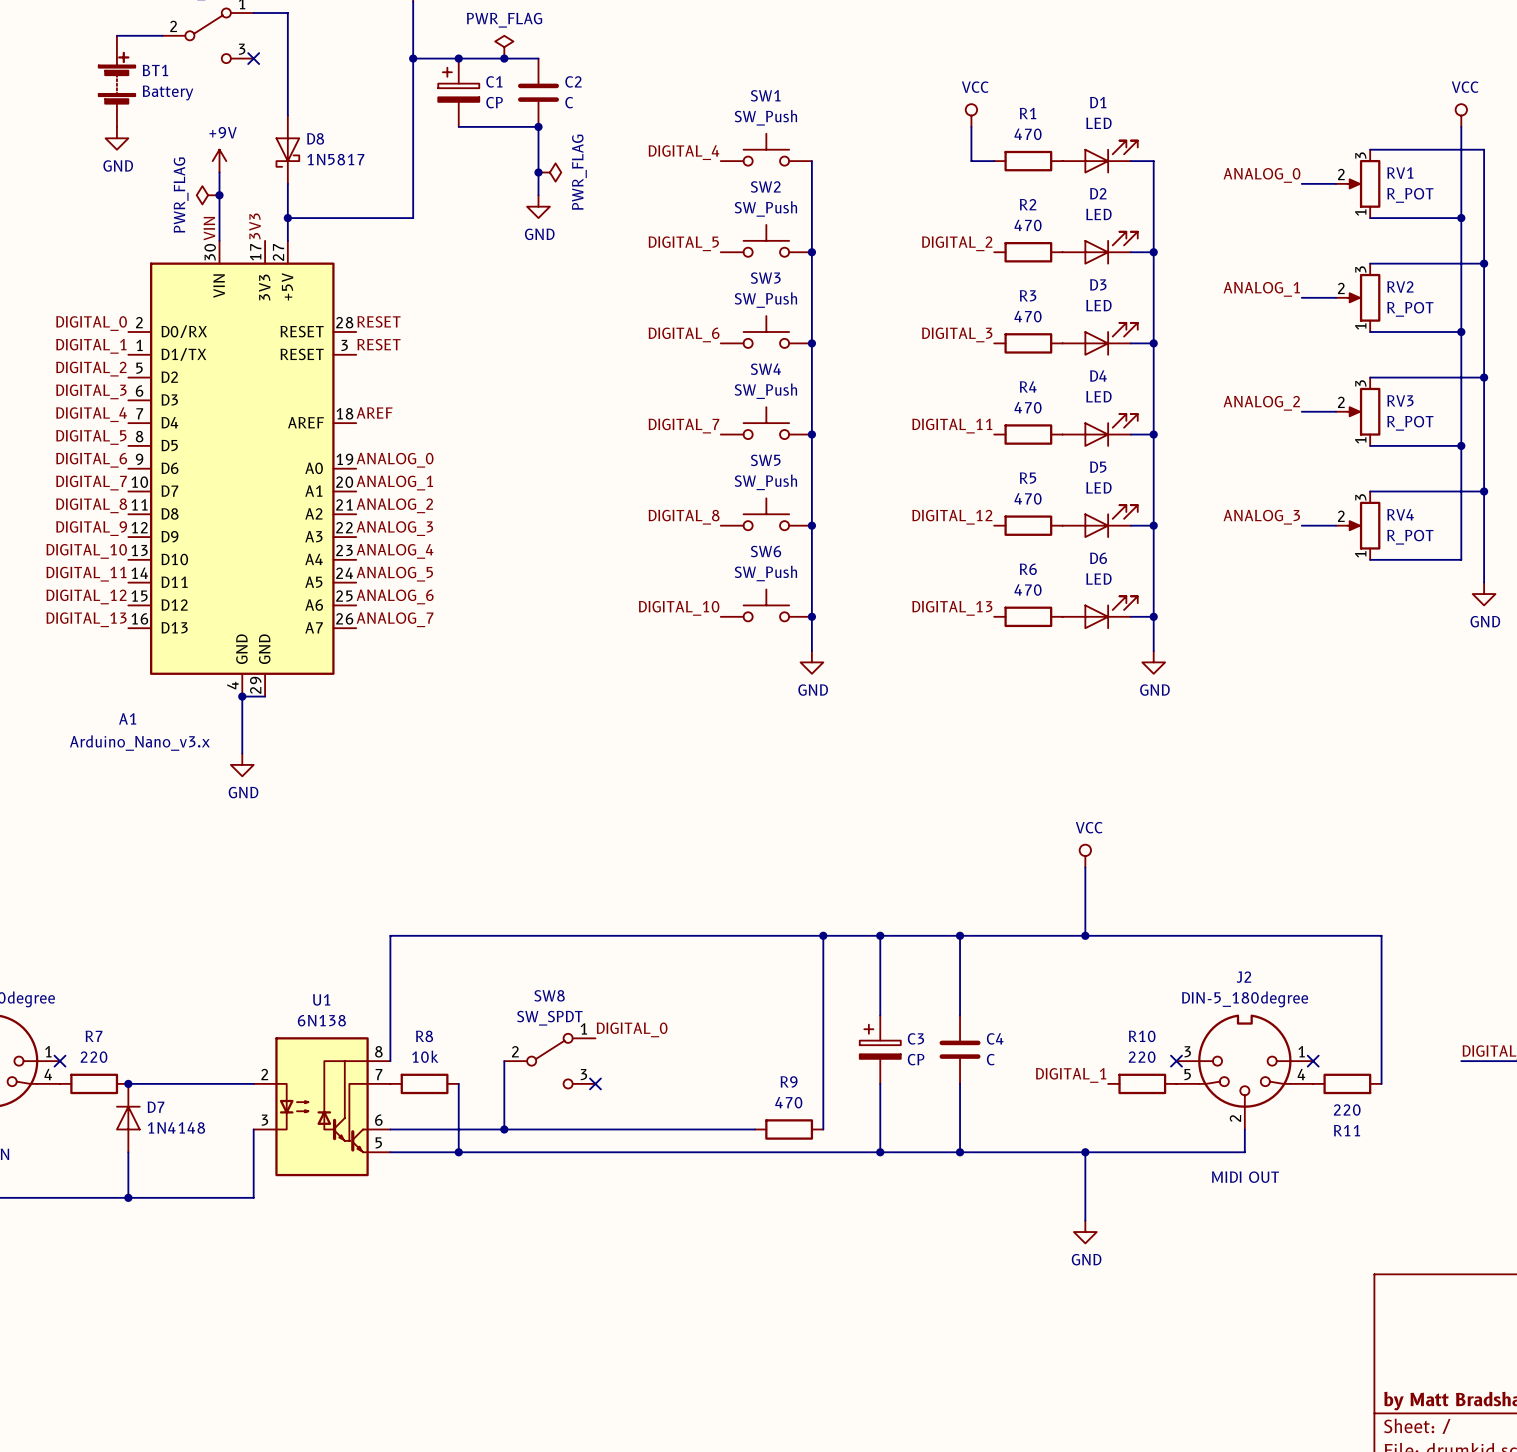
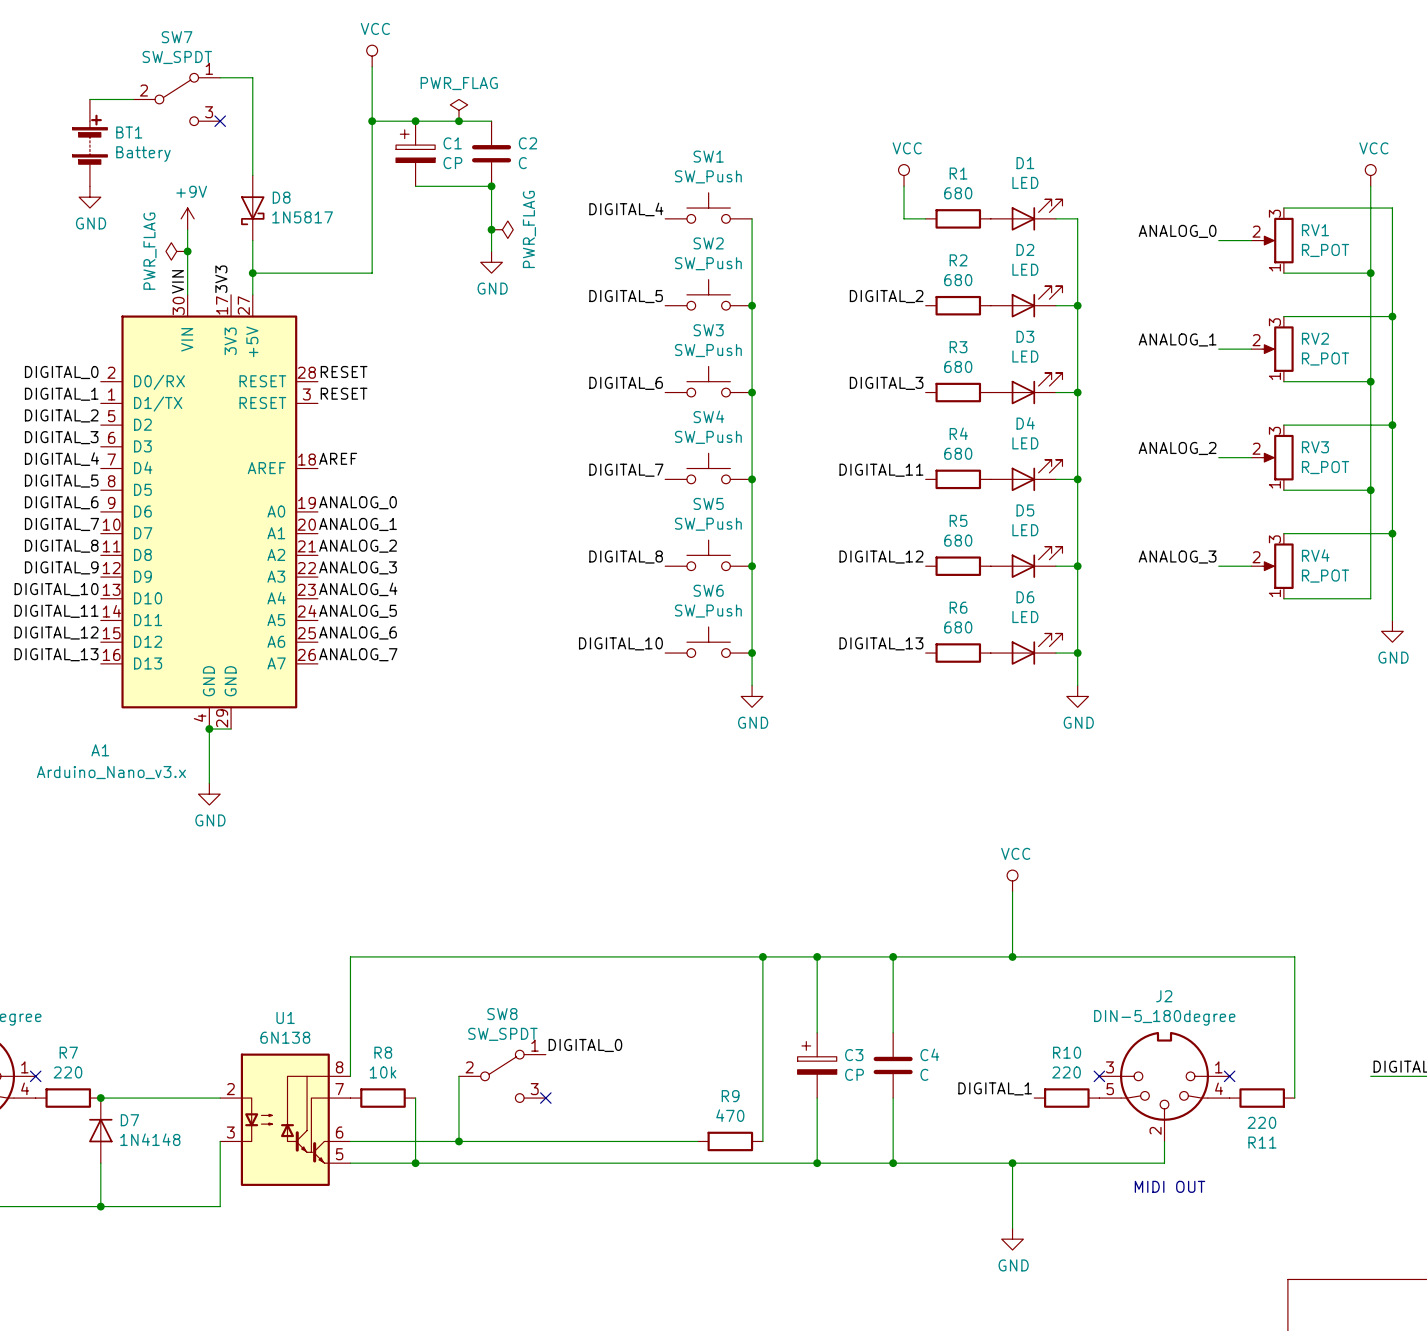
R1 value: 470 (1028, 134) -> 680 (958, 193)
R2 value: 470 (1028, 225) -> 680 (958, 280)
R3 value: 470 (1028, 316) -> 680 (958, 366)
R4 value: 470 (1028, 407) -> 680 (958, 453)
R5 value: 470 (1028, 498) -> 680 (958, 540)
R6 value: 470 (1028, 590) -> 680 (958, 627)

